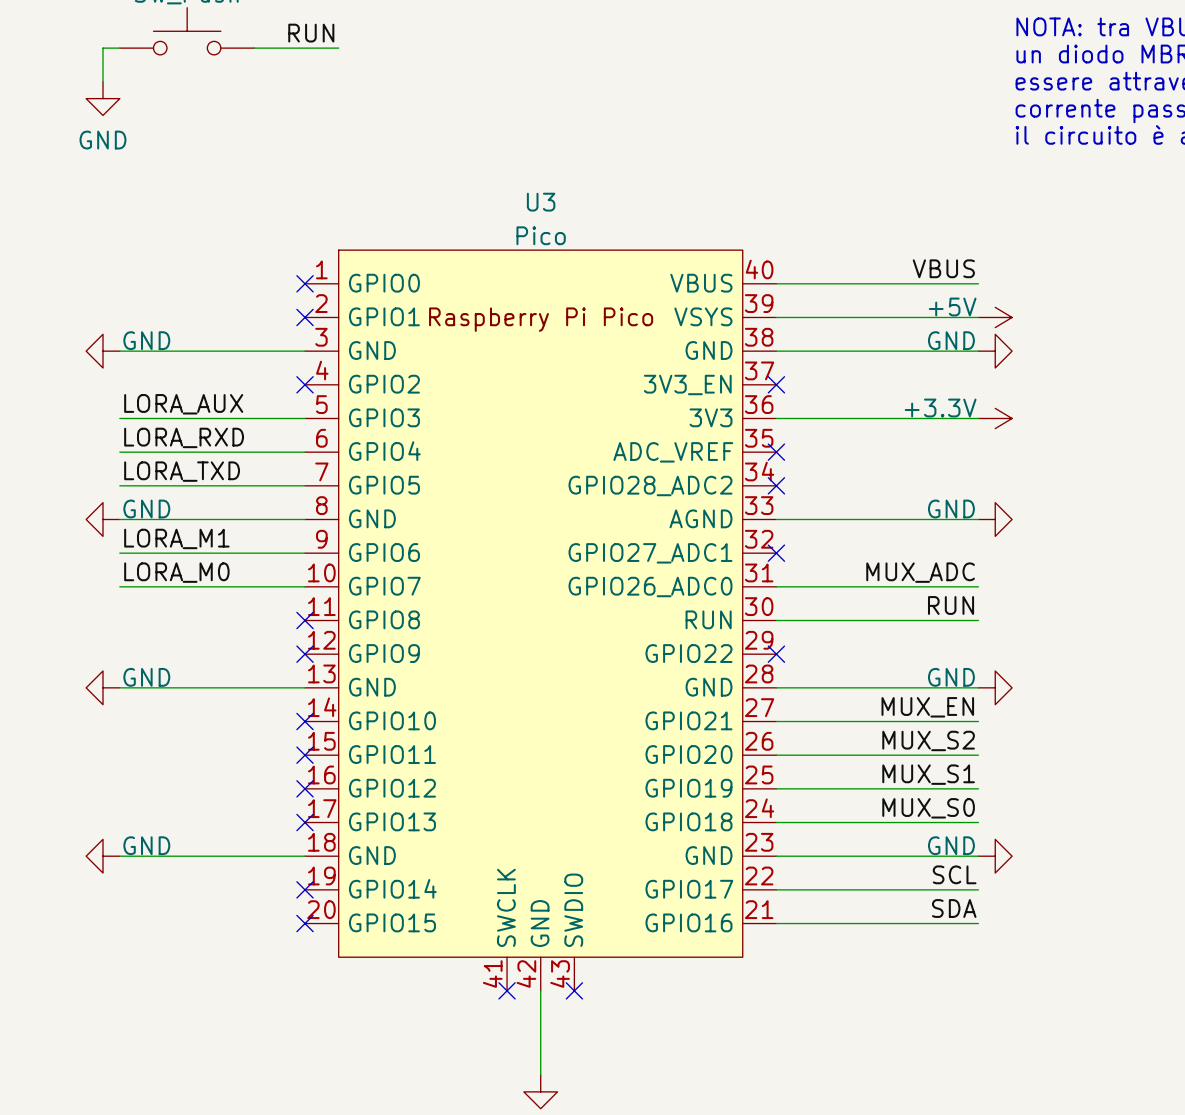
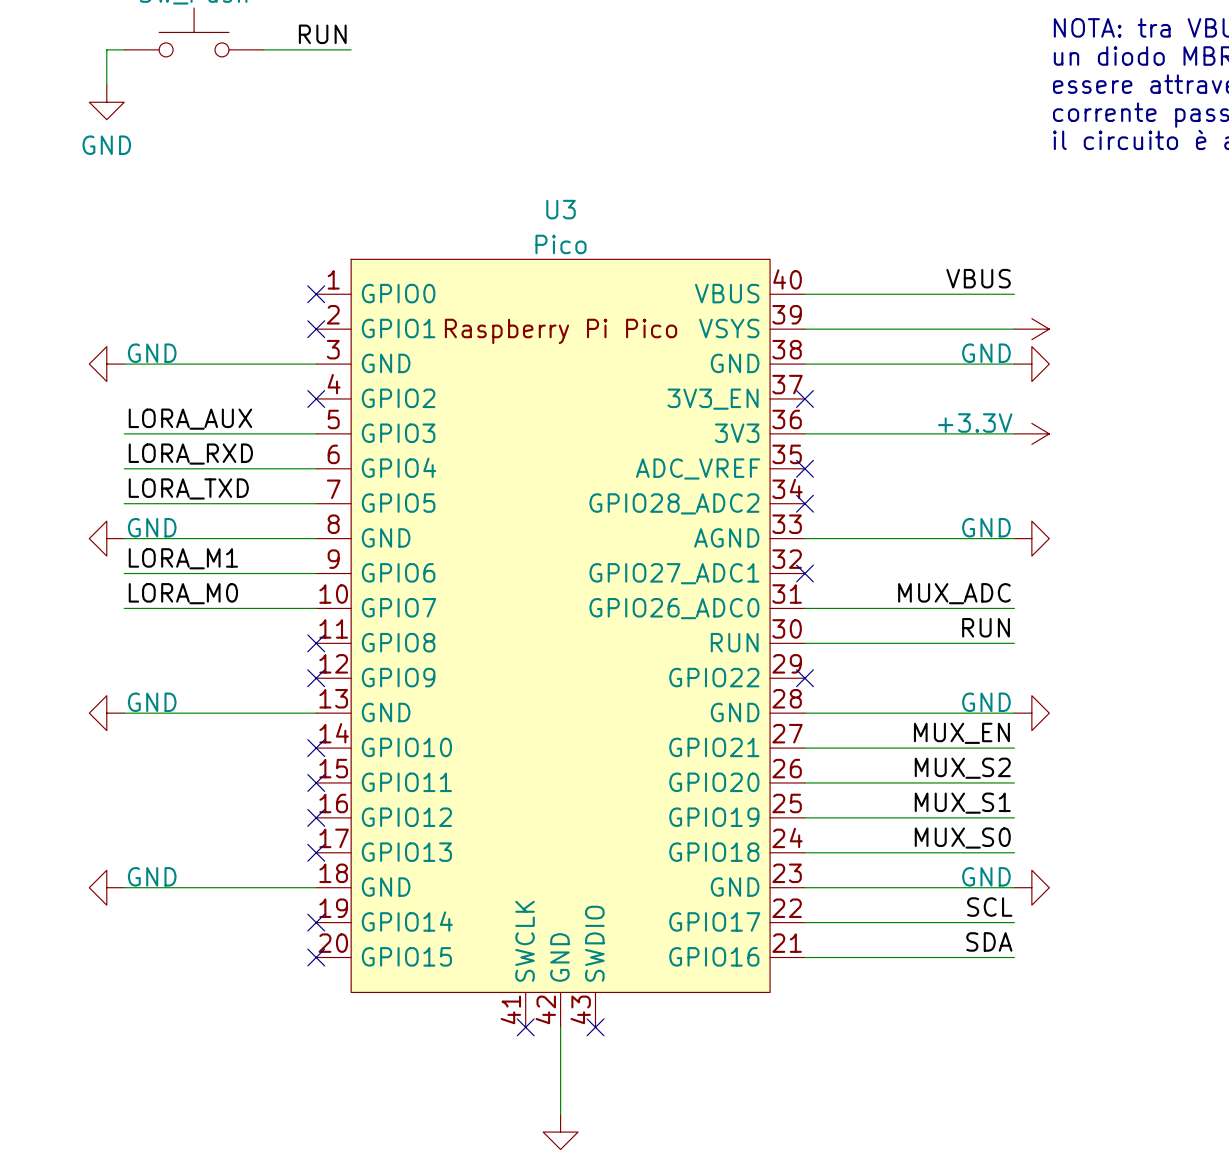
power symbol text: +5V (952, 307) -> none

